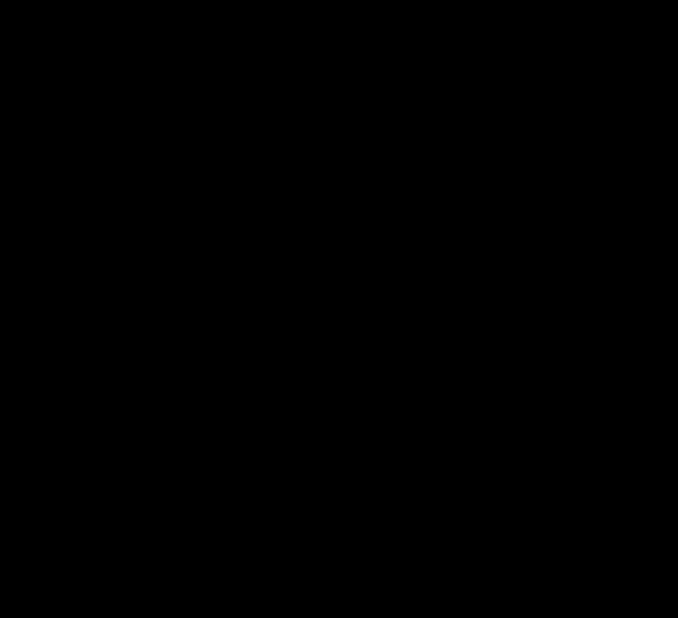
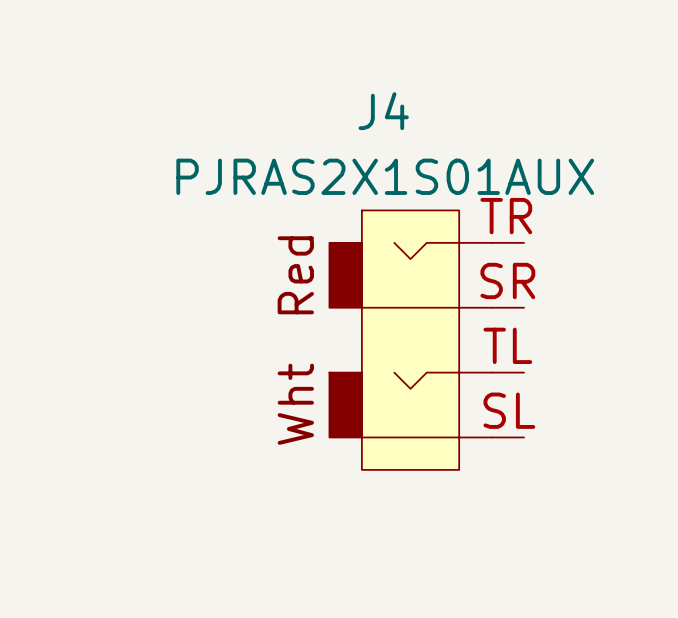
J4: none -> PJRAS2X1S01AUX (426, 340)

